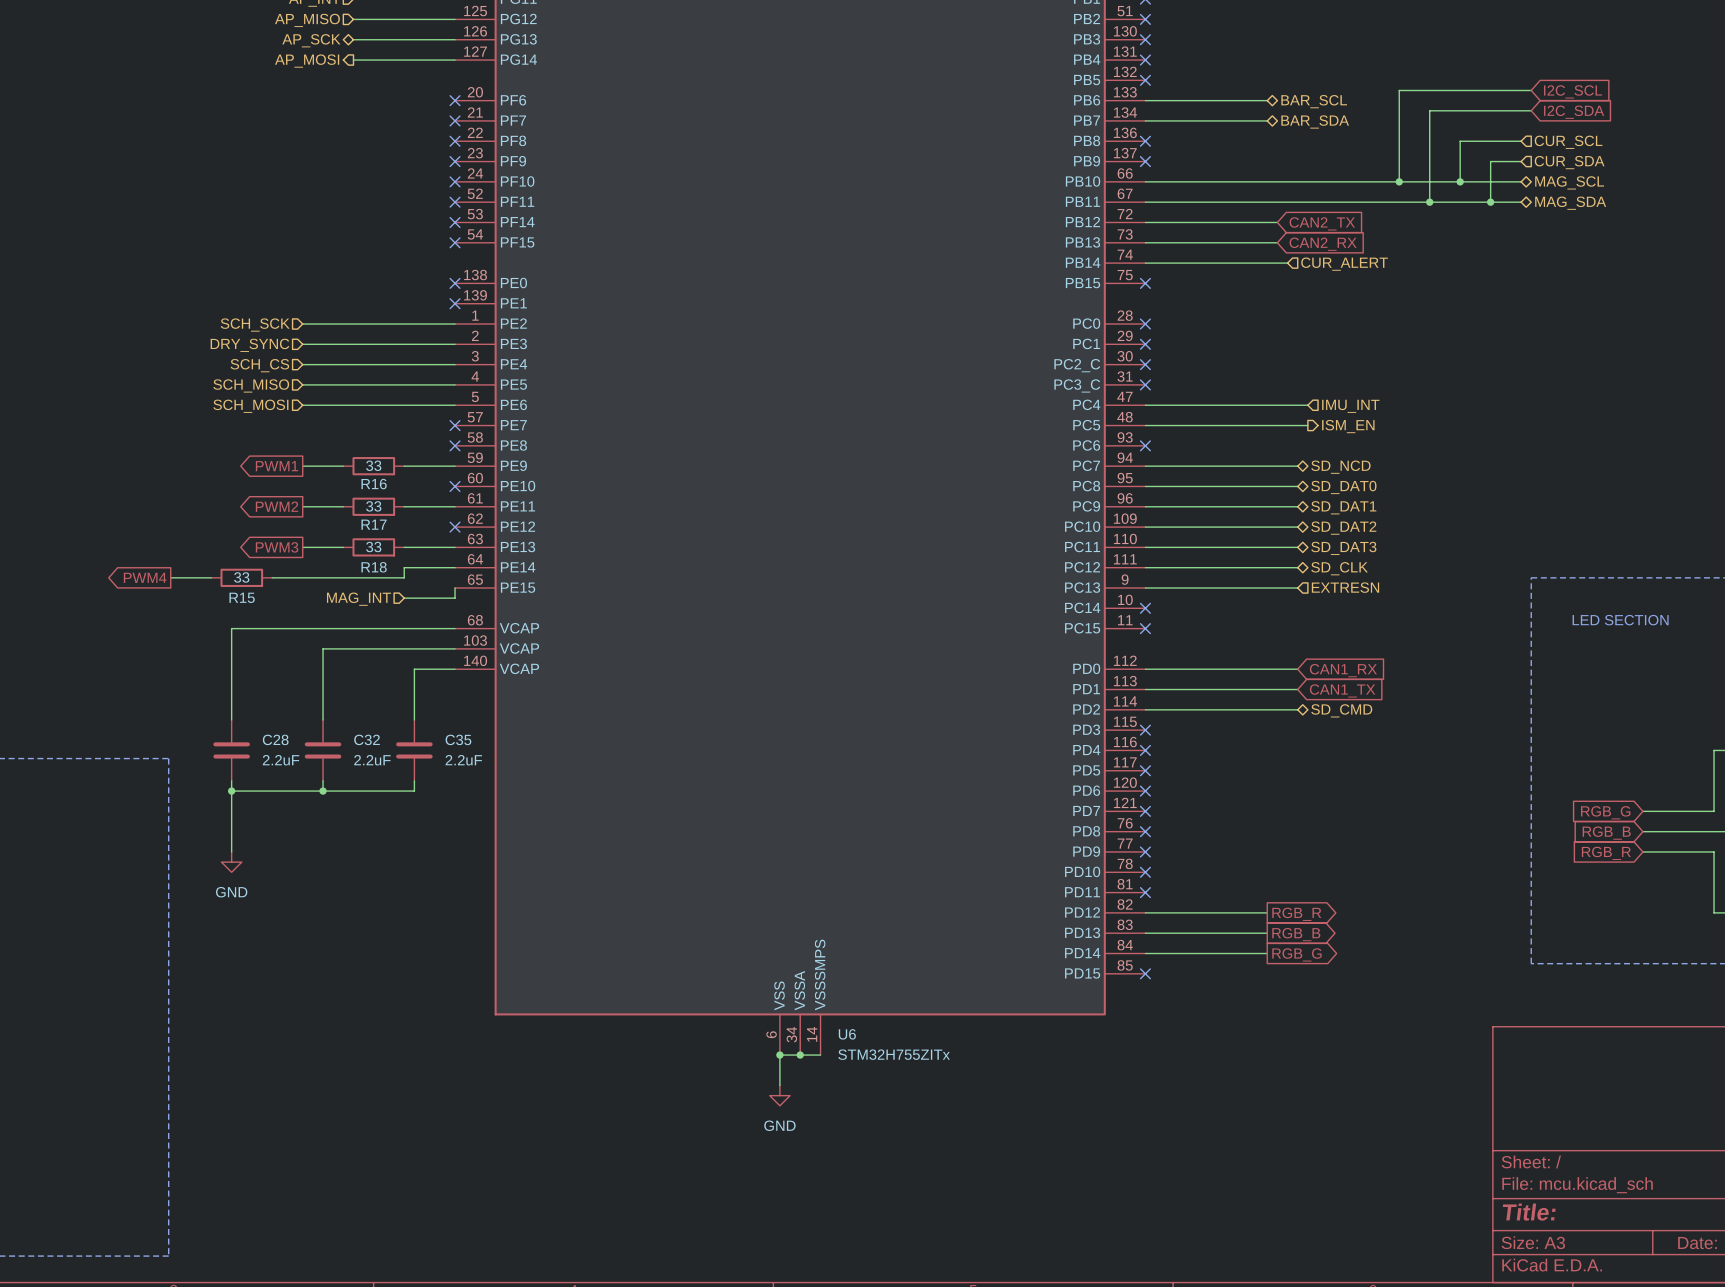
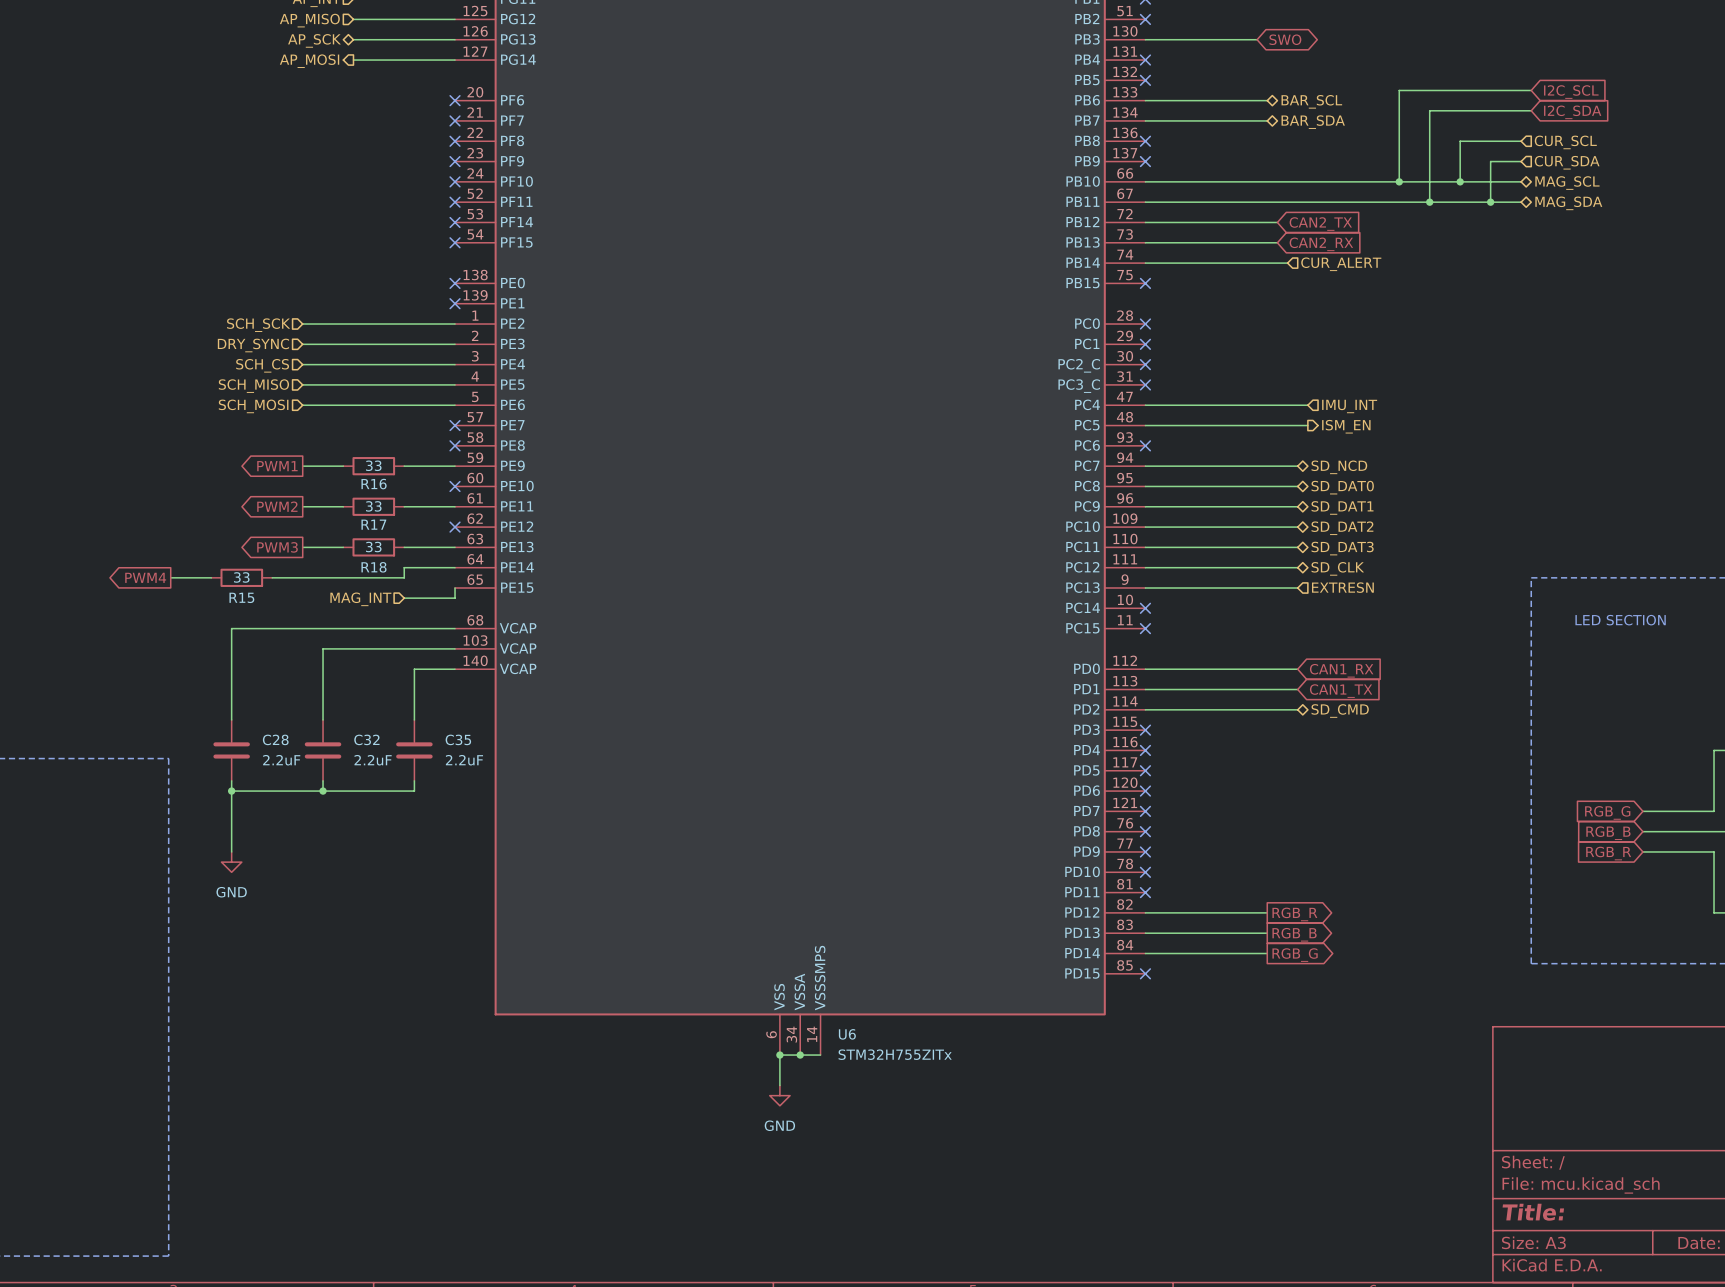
wire: none -> (1145, 39) (1257, 39)
no-connect mark: (1145, 39) -> none
global label: none -> SWO (1285, 39)

